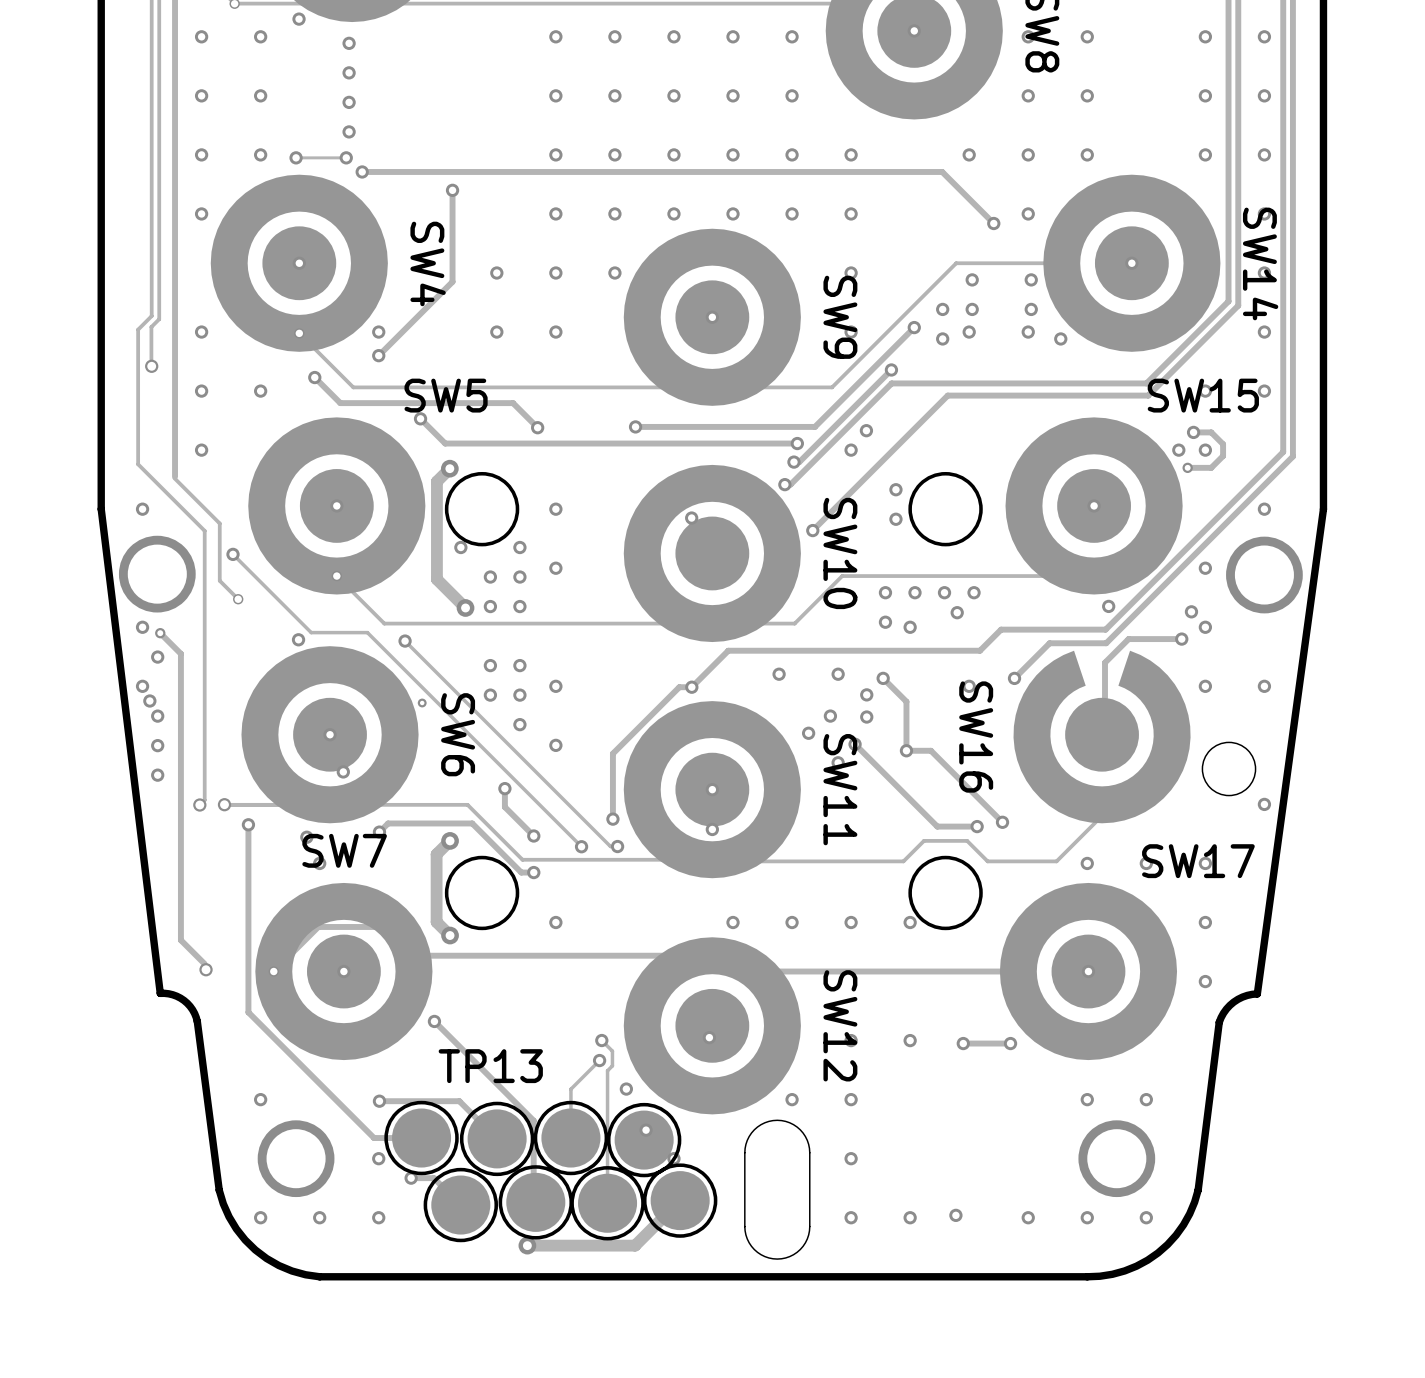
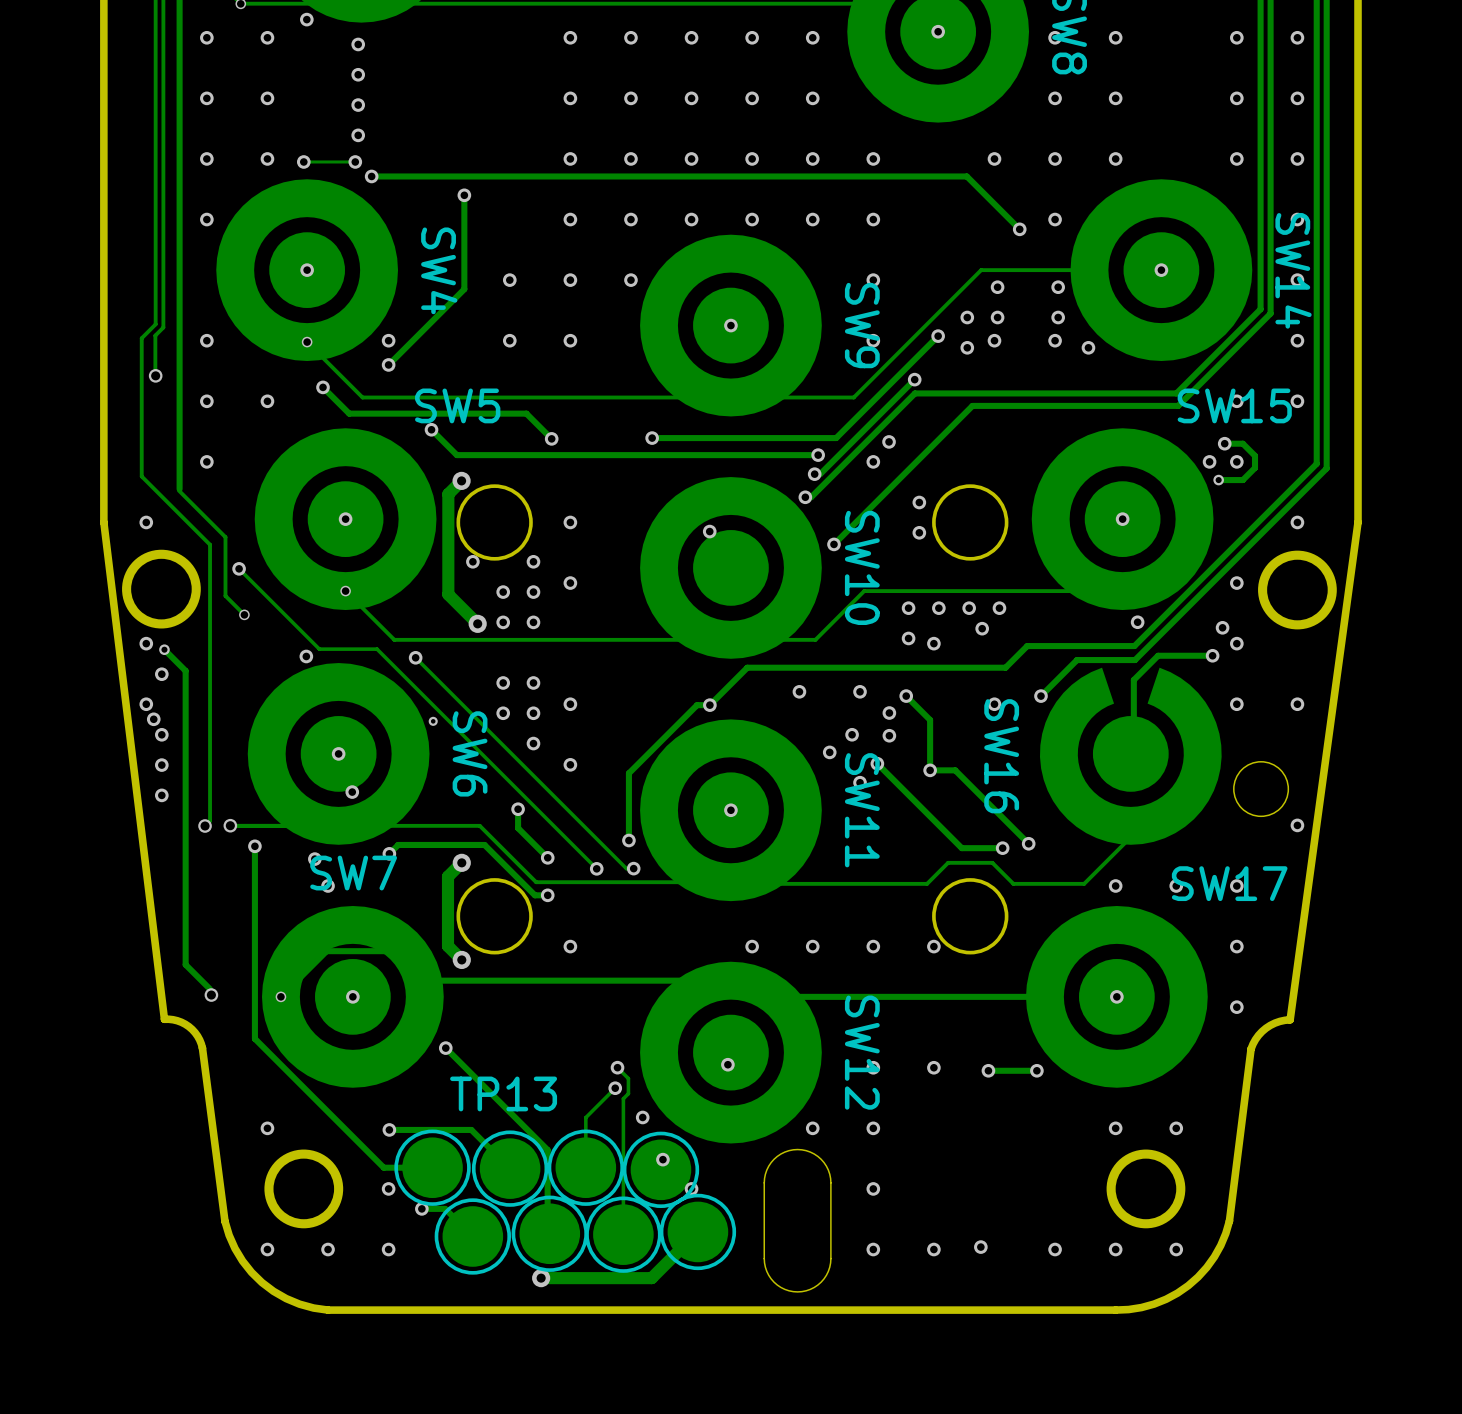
via: (712, 829) -> none

